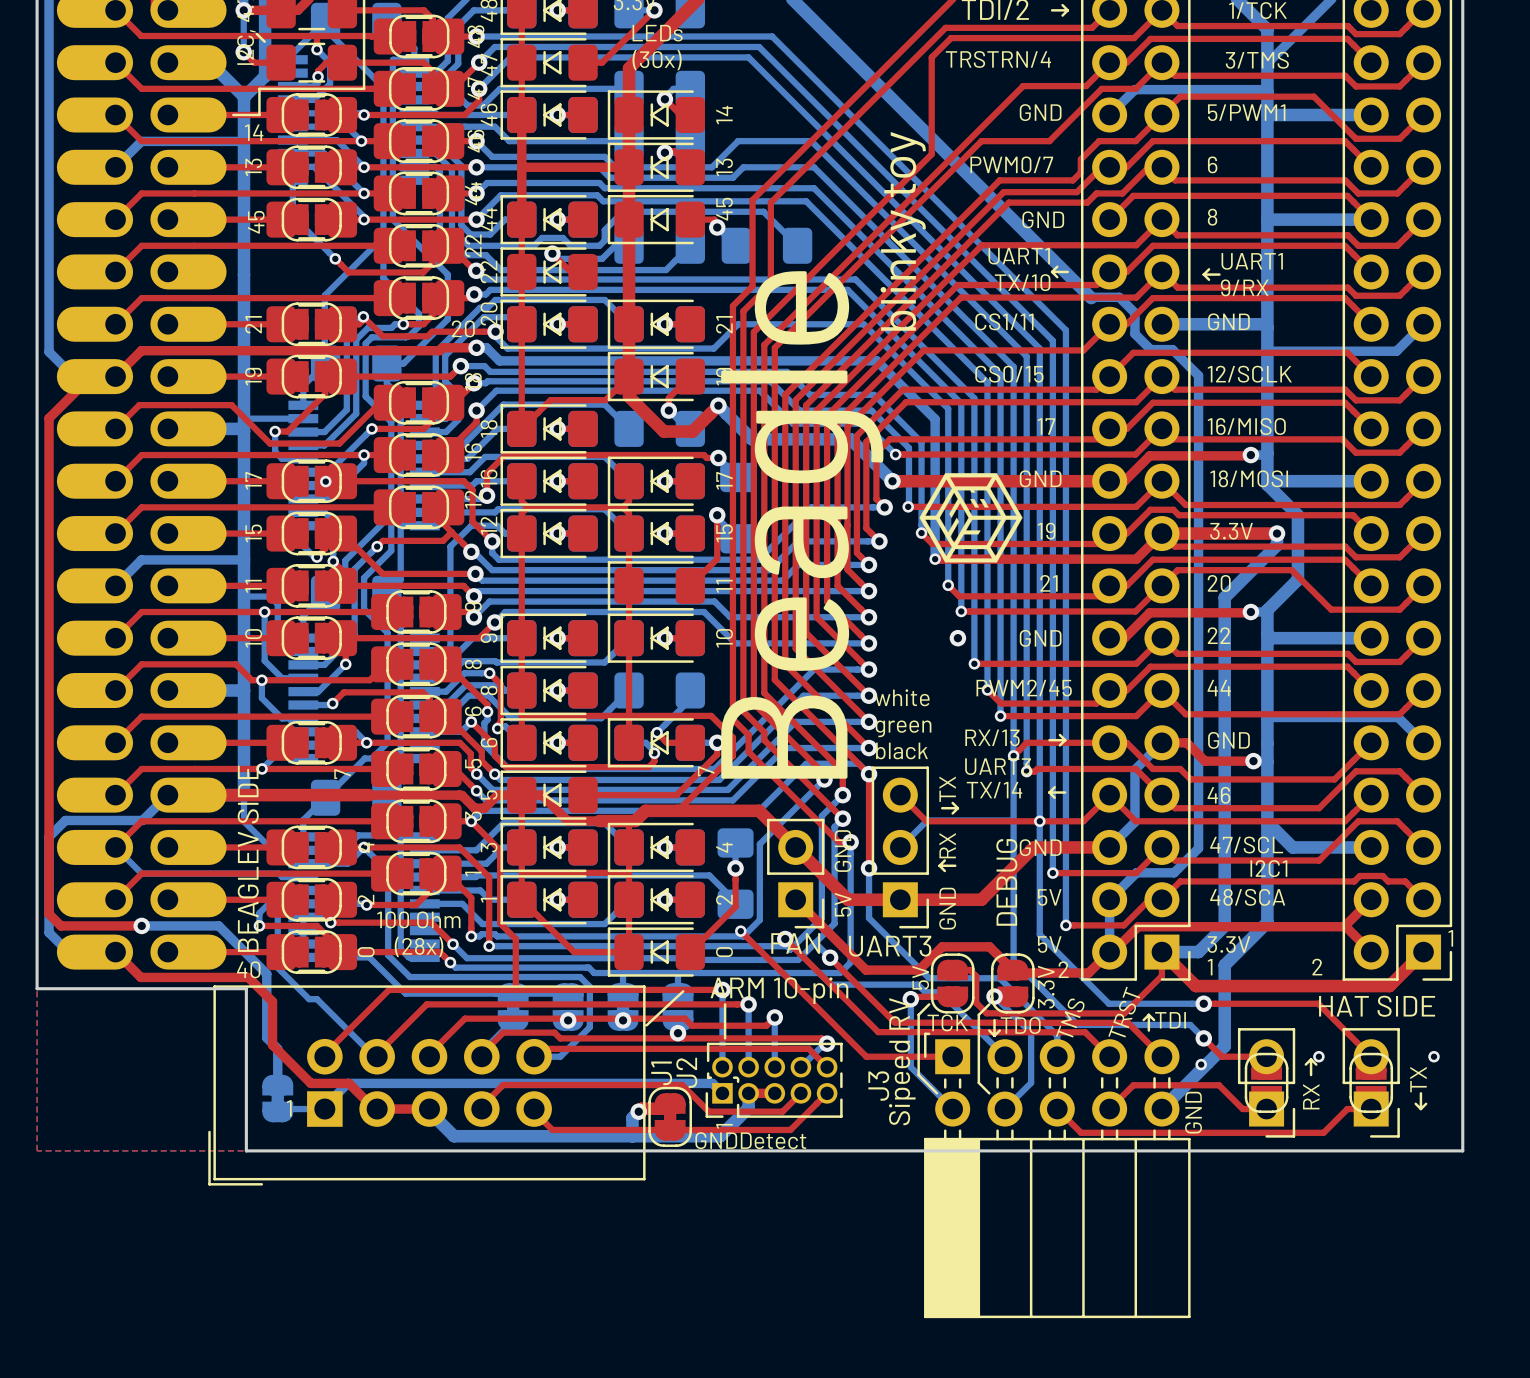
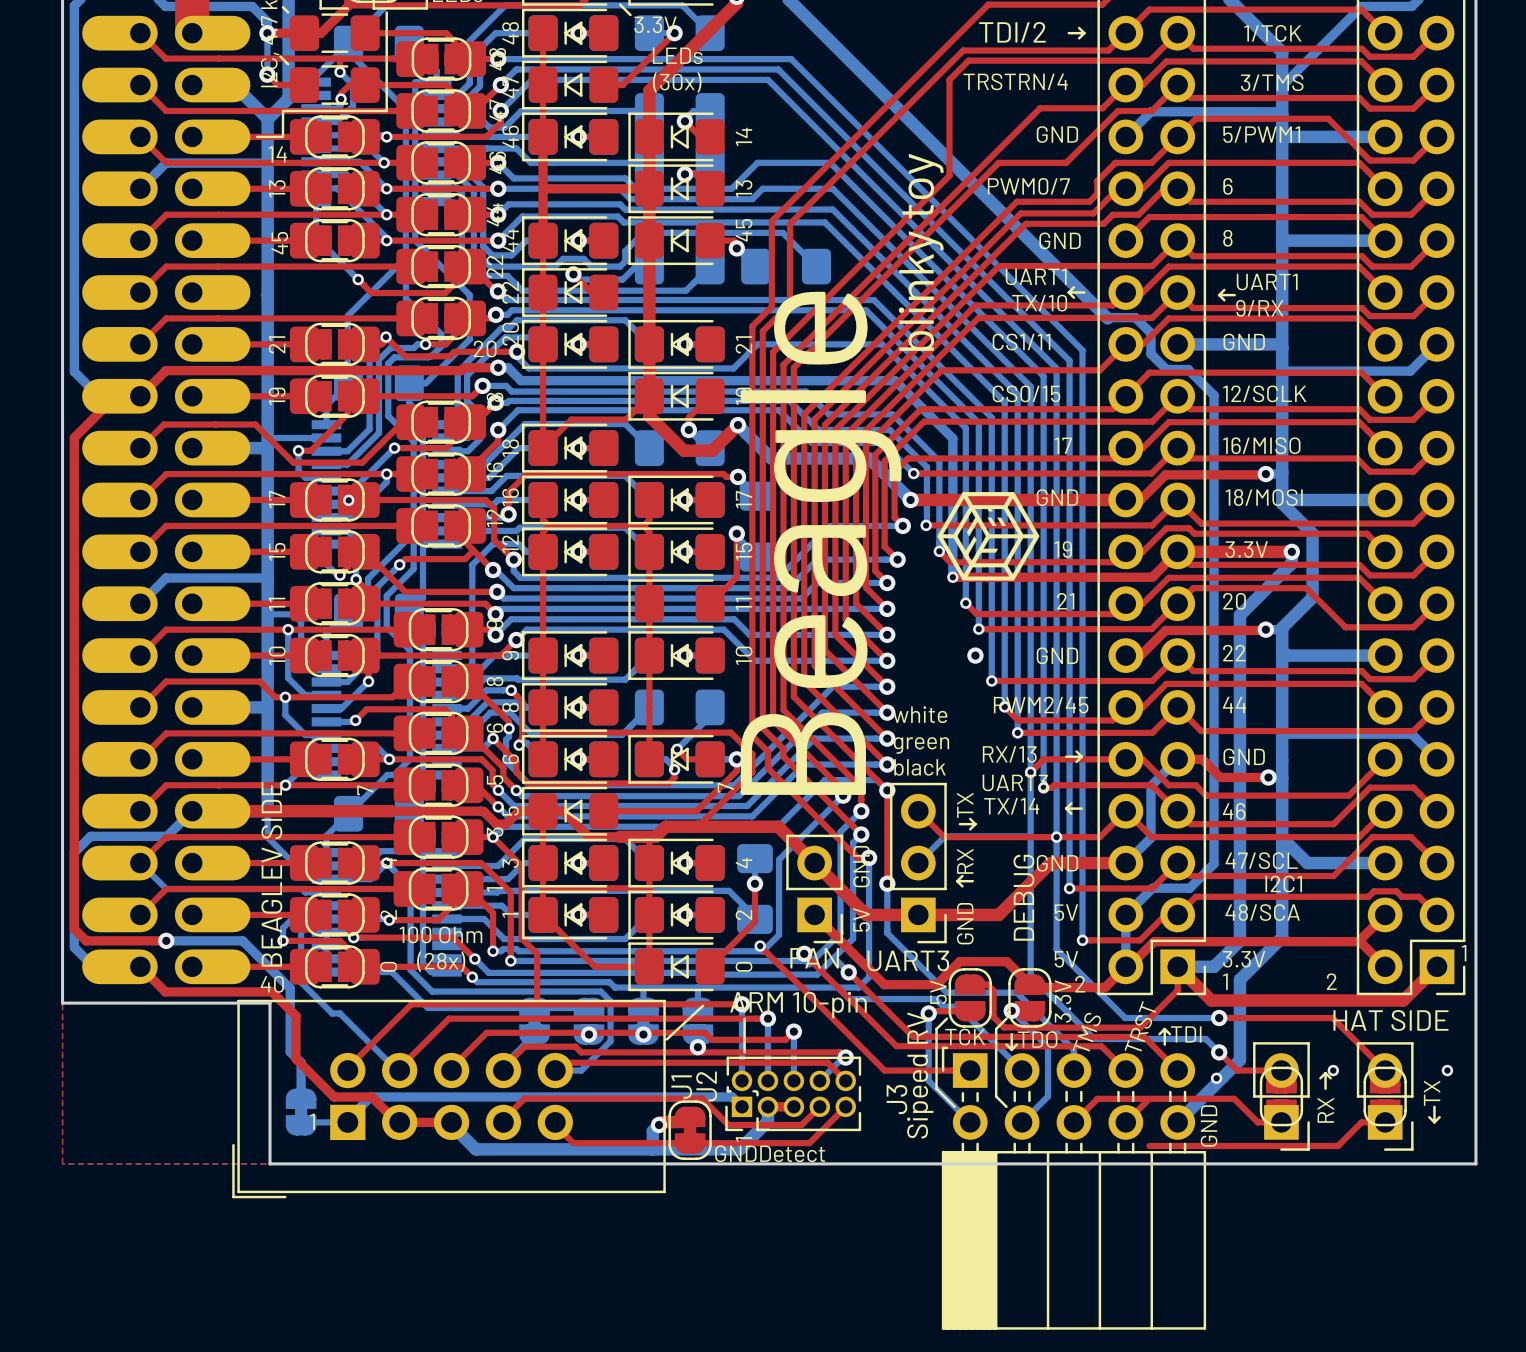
top track: (1057, 1109) (1081, 1132) (1133, 1132) -> (1073, 1122) (1097, 1098) (1149, 1098)

